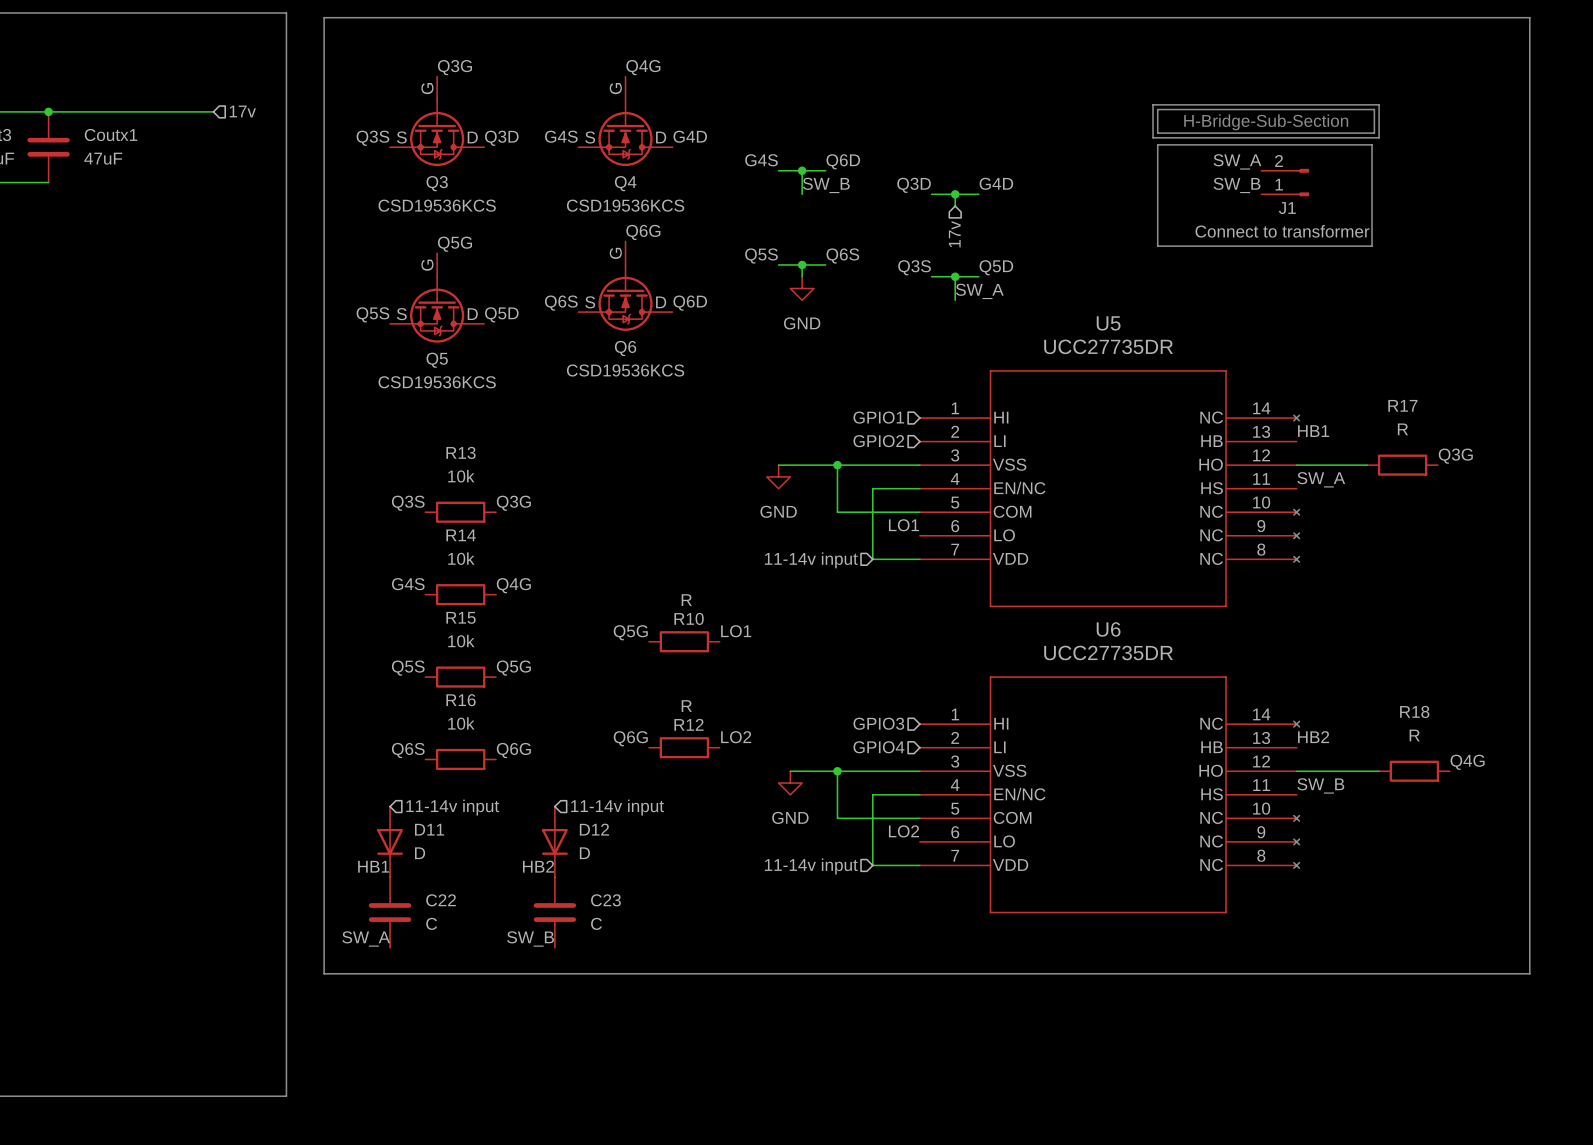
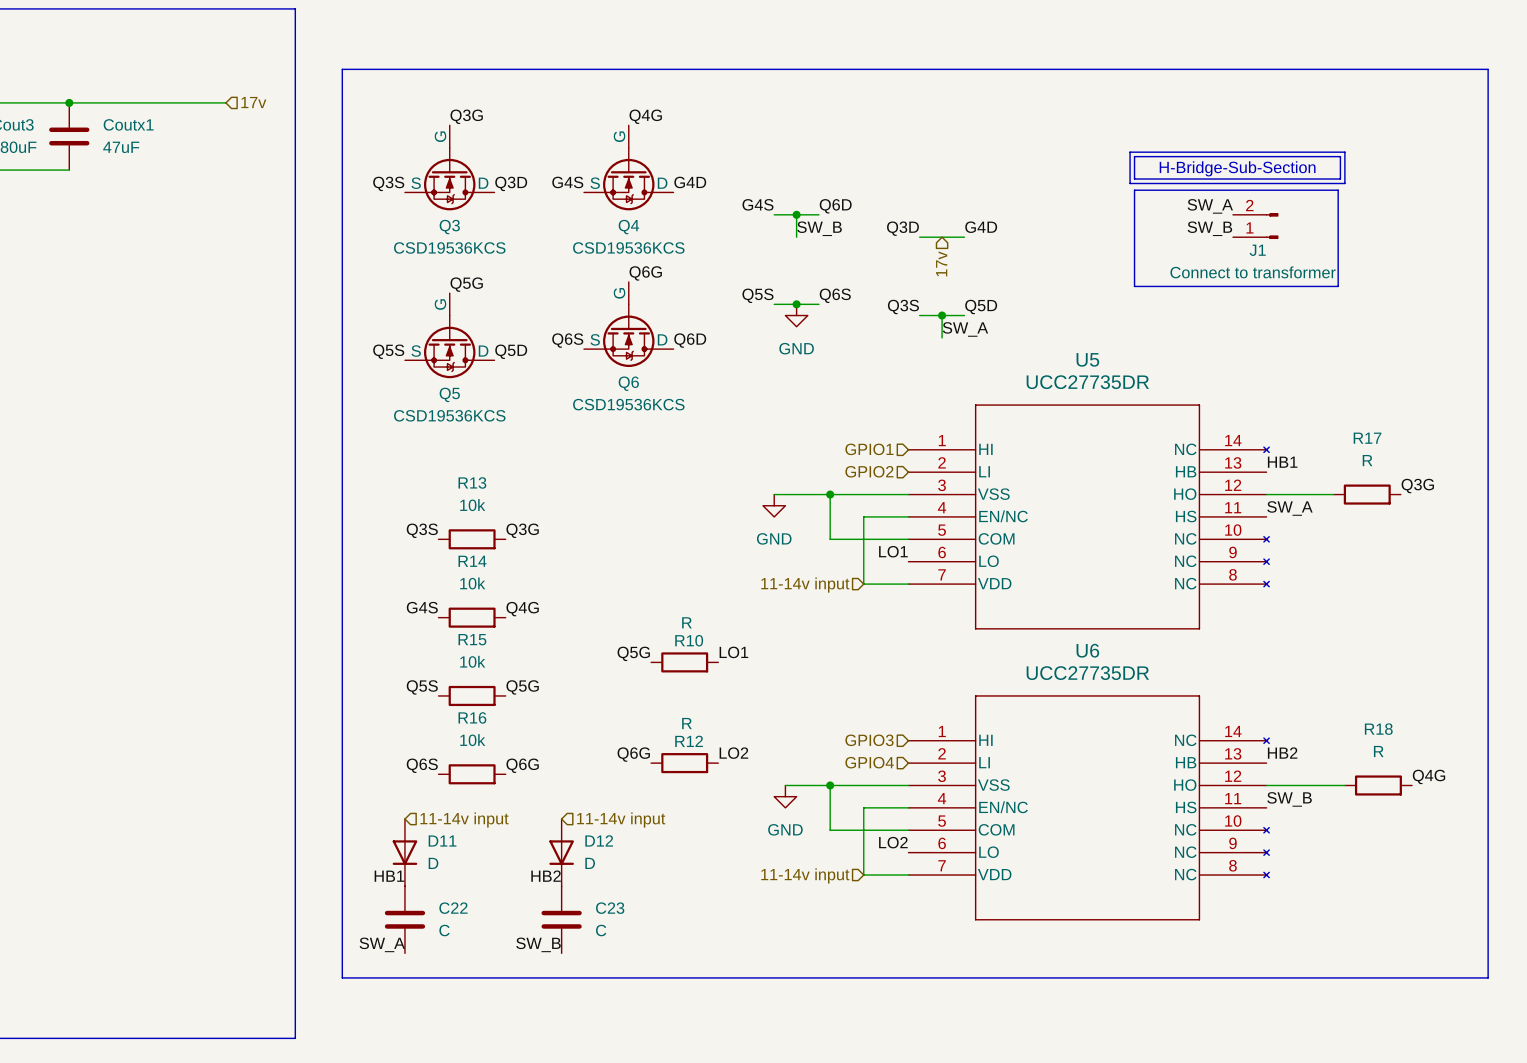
line: (324, 17) (1529, 17) (1529, 973) (324, 973) (324, 17) -> (342, 69) (1488, 69) (1488, 977) (342, 977) (342, 69)
label position: Q3G (454, 67) -> Q3G (466, 116)
label position: Q4G (643, 67) -> Q4G (645, 116)
line: (1153, 104) (1379, 104) (1379, 137) (1153, 137) (1153, 104) -> (1130, 152) (1344, 152) (1344, 183) (1130, 183) (1130, 152)
line: (1157, 109) (1157, 133) (1374, 133) (1374, 109) (1157, 109) -> (1134, 156) (1134, 179) (1340, 179) (1340, 156) (1134, 156)
Q3 position: (437, 121) -> (449, 167)
Q4 position: (625, 121) -> (628, 167)
text position: H-Bridge-Sub-Section (1266, 122) -> H-Bridge-Sub-Section (1237, 168)
label position: G4S (561, 136) -> G4S (567, 182)
label position: G4D (690, 136) -> G4D (690, 182)
label position: Q3S (372, 138) -> Q3S (388, 183)
label position: Q3D (501, 138) -> Q3D (511, 183)
line: (1157, 144) (1372, 144) (1372, 246) (1157, 246) (1157, 144) -> (1134, 190) (1338, 190) (1338, 286) (1134, 286) (1134, 190)
label position: G4S (761, 160) -> G4S (757, 204)
label position: Q6D (843, 161) -> Q6D (835, 206)
label position: SW_A (1237, 161) -> SW_A (1210, 206)
wire: (778, 170) (825, 170) -> (774, 214) (818, 214)
wire: (802, 170) (802, 194) -> (796, 214) (796, 237)
junction: (802, 170) -> none
J1 position: (1285, 182) -> (1255, 226)
label position: G4D (996, 183) -> G4D (981, 227)
label position: SW_B (826, 185) -> SW_B (819, 228)
label position: Q3D (914, 185) -> Q3D (902, 228)
label position: SW_B (1237, 185) -> SW_B (1209, 228)
wire: (931, 194) (978, 194) -> (919, 237) (964, 237)
wire: (955, 194) (955, 206) -> none
junction: (955, 194) -> none
junction: none -> (796, 214)
label position: Q6G (643, 232) -> Q6G (645, 273)
hierarchical label position: 17v (954, 234) -> 17v (941, 263)
label position: Q5G (454, 244) -> Q5G (466, 284)
label position: Q5S (761, 255) -> Q5S (757, 295)
label position: Q6S (842, 255) -> Q6S (835, 295)
wire: (778, 264) (825, 264) -> (774, 304) (818, 304)
wire: (802, 264) (802, 276) -> none
junction: (802, 264) -> none
label position: Q3S (914, 267) -> Q3S (903, 307)
label position: Q5D (996, 267) -> Q5D (981, 307)
wire: (931, 276) (978, 276) -> (919, 315) (964, 315)
wire: (955, 276) (955, 300) -> (942, 315) (942, 337)
junction: (955, 276) -> none
Q6 position: (625, 286) -> (628, 324)
power symbol position: GND (802, 288) -> GND (796, 315)
label position: SW_A (979, 291) -> SW_A (965, 329)
Q5 position: (437, 297) -> (449, 335)
label position: Q6S (561, 303) -> Q6S (567, 340)
label position: Q6D (690, 303) -> Q6D (690, 340)
label position: Q5S (372, 314) -> Q5S (388, 351)
label position: Q5D (501, 314) -> Q5D (511, 351)
junction: none -> (796, 304)
junction: none -> (942, 315)
hierarchical label position: GPIO1 (878, 417) -> GPIO1 (869, 449)
label position: HB1 (1313, 431) -> HB1 (1282, 462)
hierarchical label position: GPIO2 (878, 441) -> GPIO2 (869, 471)
label position: Q3G (1455, 456) -> Q3G (1417, 486)
wire: (778, 465) (919, 465) -> (774, 494) (908, 494)
wire: (837, 465) (837, 512) (919, 512) -> (830, 494) (830, 539) (908, 539)
junction: (837, 465) -> none
wire: (1296, 465) (1367, 465) -> (1266, 494) (1333, 494)
R17 position: (1402, 465) -> (1367, 494)
power symbol position: GND (778, 476) -> GND (774, 505)
label position: SW_A (1321, 479) -> SW_A (1289, 508)
wire: (919, 488) (872, 488) (872, 559) (919, 559) -> (908, 516) (863, 516) (863, 584) (908, 584)
U5 position: (1109, 488) -> (1088, 516)
label position: Q3S (408, 503) -> Q3S (422, 530)
label position: Q3G (513, 503) -> Q3G (522, 530)
R13 position: (460, 512) -> (472, 539)
junction: none -> (830, 494)
label position: LO1 (903, 525) -> LO1 (893, 551)
hierarchical label position: 11-14v input (811, 560) -> 11-14v input (805, 585)
label position: G4S (408, 584) -> G4S (422, 607)
label position: Q4G (513, 585) -> Q4G (522, 609)
R14 position: (460, 594) -> (472, 617)
label position: LO1 (736, 631) -> LO1 (733, 652)
label position: Q5G (630, 632) -> Q5G (633, 653)
R10 position: (684, 641) -> (684, 662)
label position: Q5S (408, 668) -> Q5S (422, 687)
label position: Q5G (513, 668) -> Q5G (522, 687)
R15 position: (460, 677) -> (472, 695)
hierarchical label position: GPIO3 (878, 723) -> GPIO3 (869, 740)
label position: LO2 (736, 737) -> LO2 (733, 753)
label position: HB2 (1313, 737) -> HB2 (1282, 753)
label position: Q6G (630, 738) -> Q6G (633, 754)
R12 position: (684, 747) -> (684, 763)
hierarchical label position: GPIO4 (878, 747) -> GPIO4 (869, 762)
label position: Q6S (408, 750) -> Q6S (422, 765)
label position: Q6G (513, 750) -> Q6G (522, 765)
R16 position: (460, 759) -> (472, 774)
label position: Q4G (1467, 762) -> Q4G (1428, 776)
wire: (790, 771) (919, 771) -> (785, 785) (908, 785)
wire: (837, 771) (837, 818) (919, 818) -> (830, 785) (830, 830) (908, 830)
junction: (837, 771) -> none
wire: (1296, 771) (1379, 771) -> (1266, 785) (1344, 785)
R18 position: (1414, 771) -> (1378, 785)
power symbol position: GND (790, 783) -> GND (785, 796)
label position: SW_B (1320, 785) -> SW_B (1289, 799)
wire: (919, 794) (872, 794) (872, 865) (919, 865) -> (908, 807) (863, 807) (863, 875) (908, 875)
U6 position: (1109, 794) -> (1088, 807)
hierarchical label position: 11-14v input (452, 807) -> 11-14v input (464, 820)
hierarchical label position: 11-14v input (617, 807) -> 11-14v input (621, 820)
junction: none -> (830, 785)
label position: LO2 (903, 831) -> LO2 (893, 842)
D11 position: (390, 841) -> (404, 852)
D12 position: (554, 841) -> (561, 852)
label position: HB1 (373, 866) -> HB1 (389, 876)
label position: HB2 (538, 866) -> HB2 (546, 876)
hierarchical label position: 11-14v input (811, 866) -> 11-14v input (805, 875)
C22 position: (390, 912) -> (404, 919)
C23 position: (554, 912) -> (561, 919)
label position: SW_A (366, 938) -> SW_A (382, 944)
label position: SW_B (530, 938) -> SW_B (538, 944)

